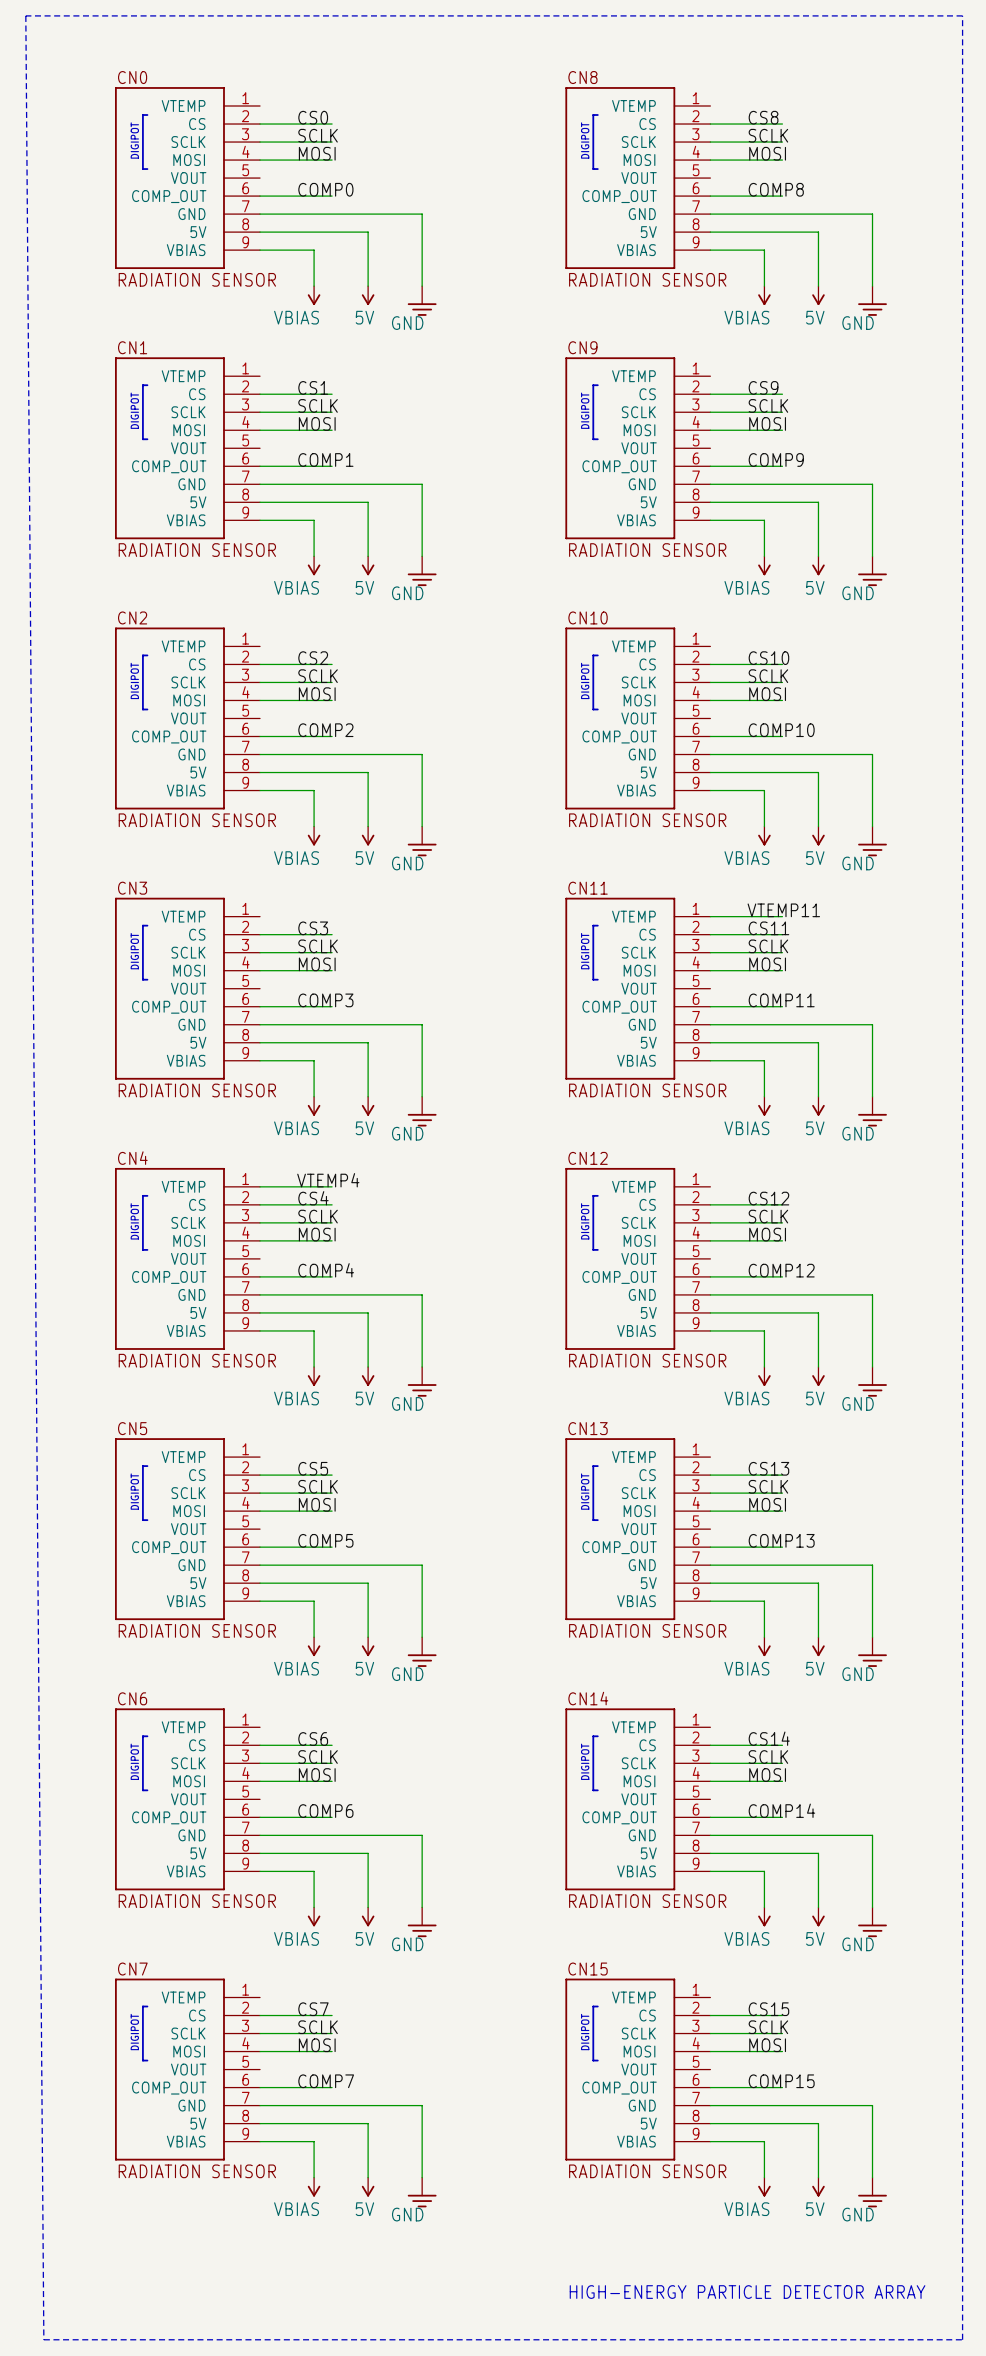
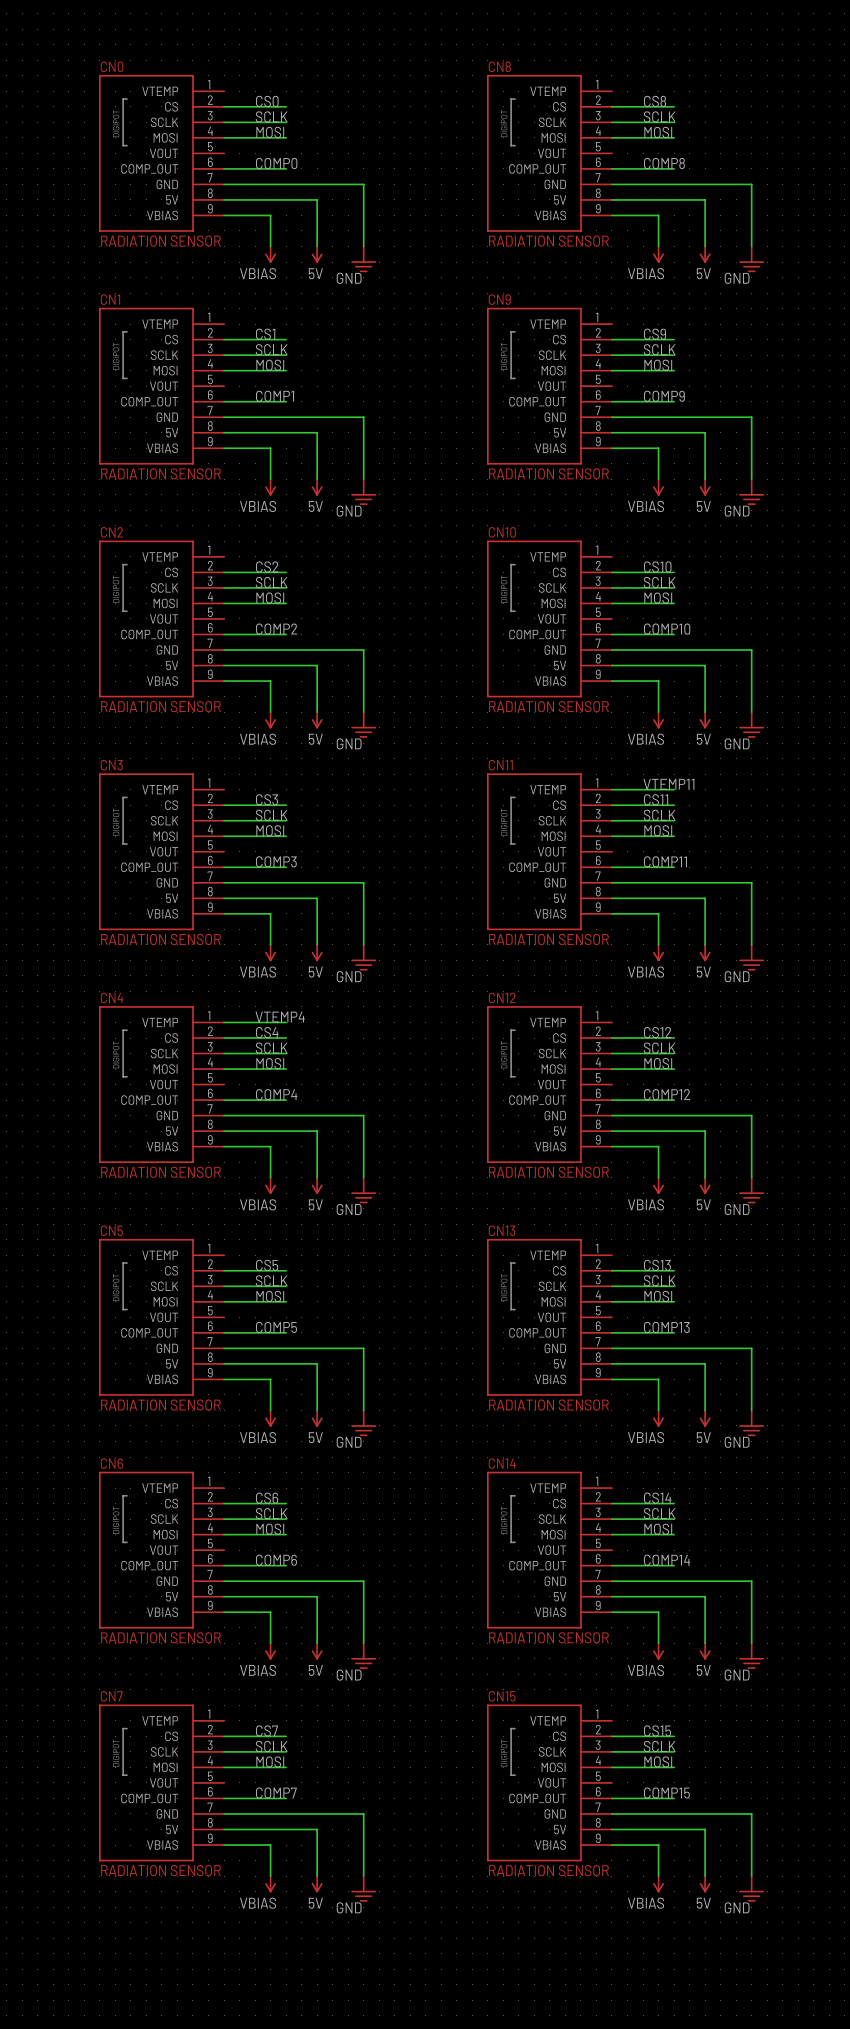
line: (25, 15) (43, 2339) (962, 2339) (962, 15) (25, 15) -> none
text: HIGH-ENERGY PARTICLE DETECTOR ARRAY (747, 2292) -> none

